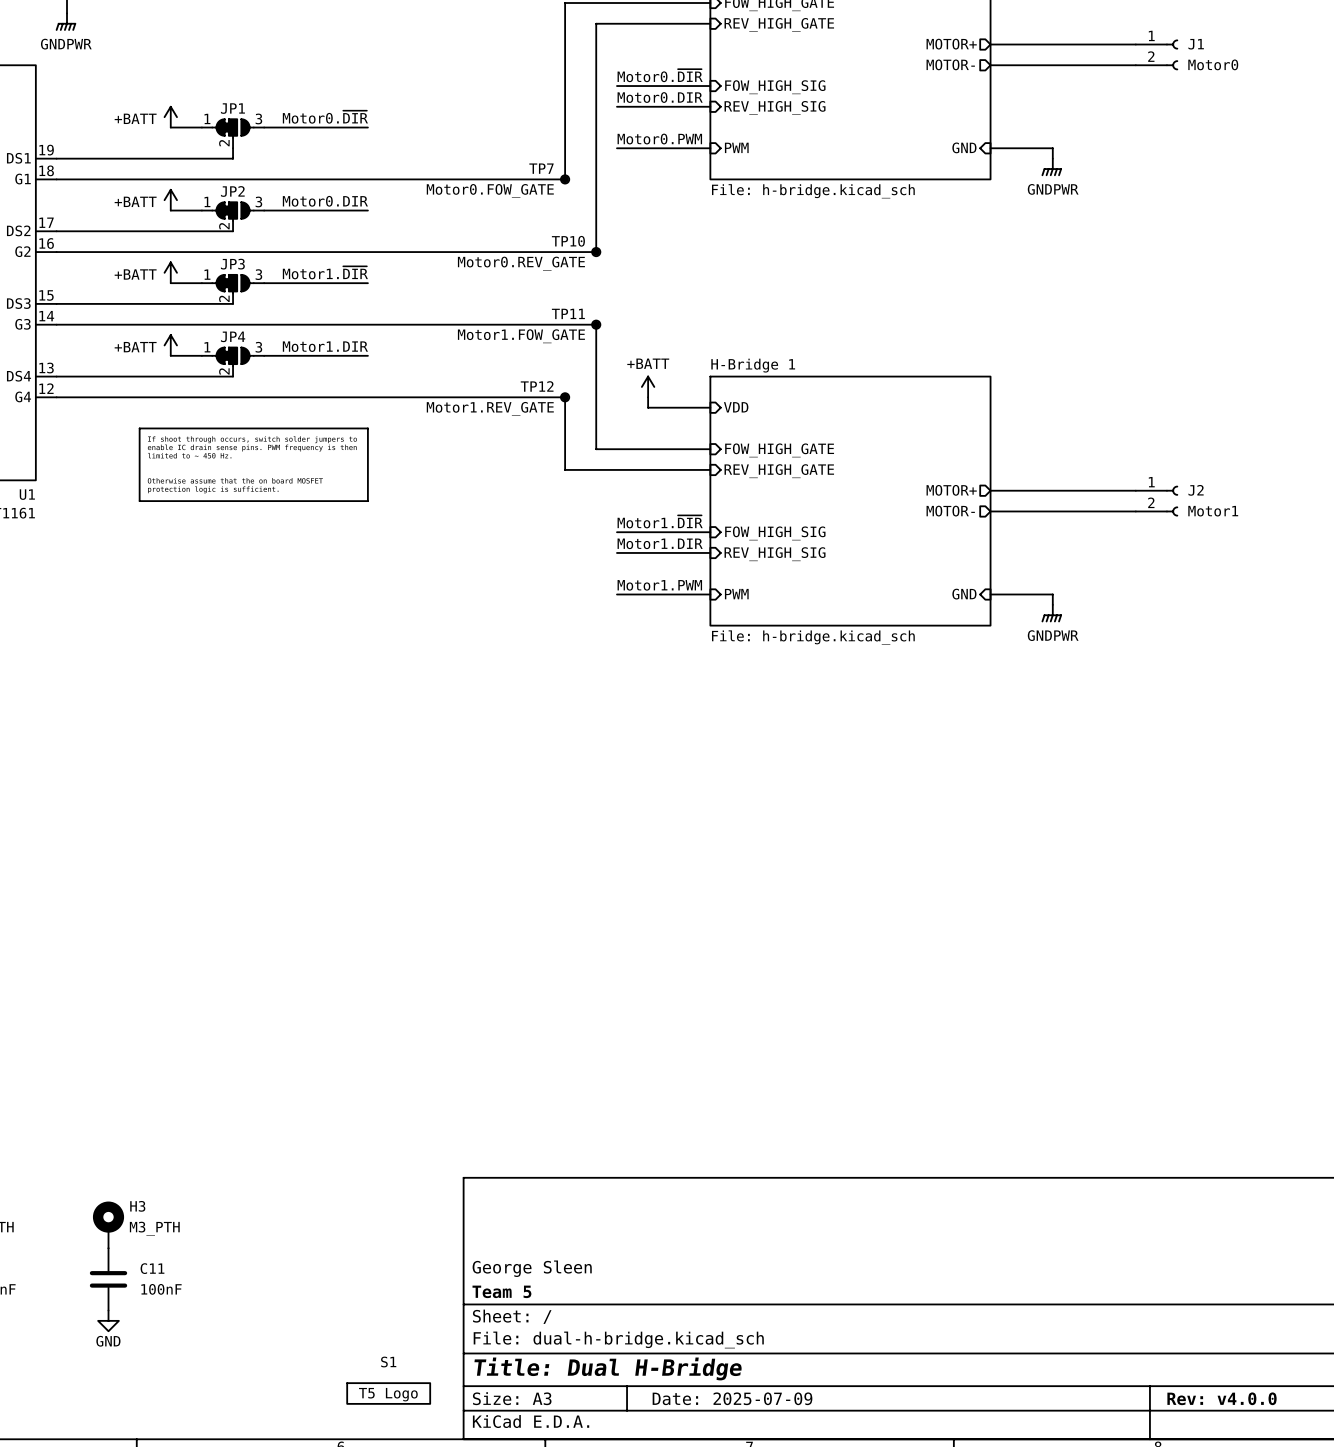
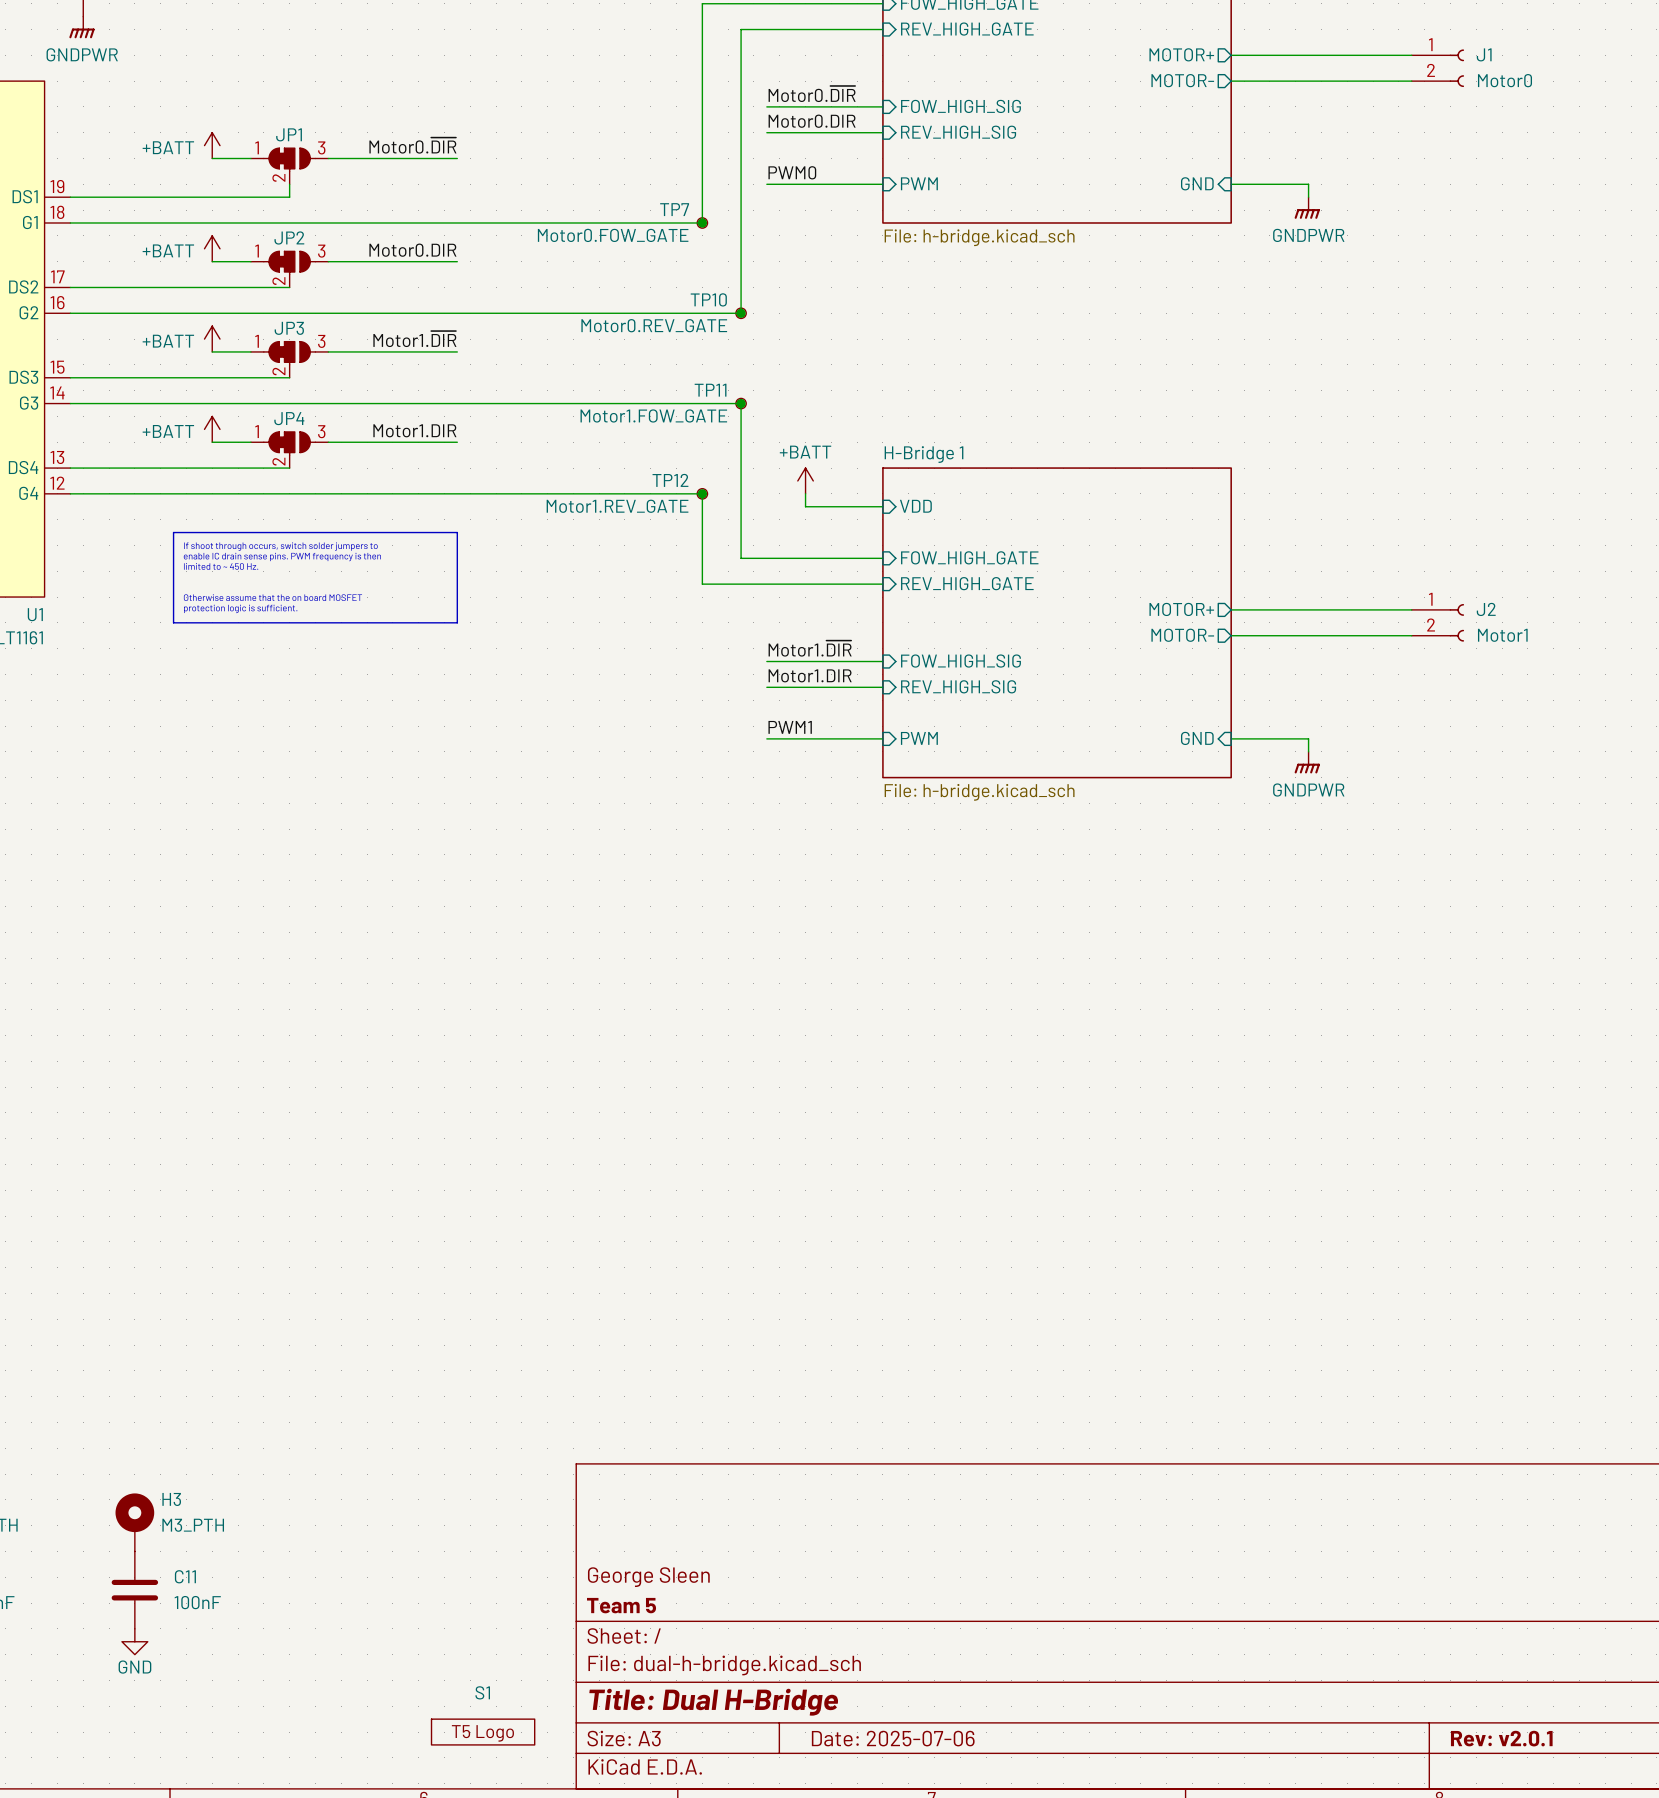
label: Motor0.PWM (659, 139) -> PWM0 (792, 172)
label: Motor1.PWM (659, 585) -> PWM1 (790, 727)
title block: Date: 2025-07-09 (732, 1398) -> Date: 2025-07-06 (893, 1738)
title block: Rev: v4.0.0 (1222, 1398) -> Rev: v2.0.1 (1501, 1738)

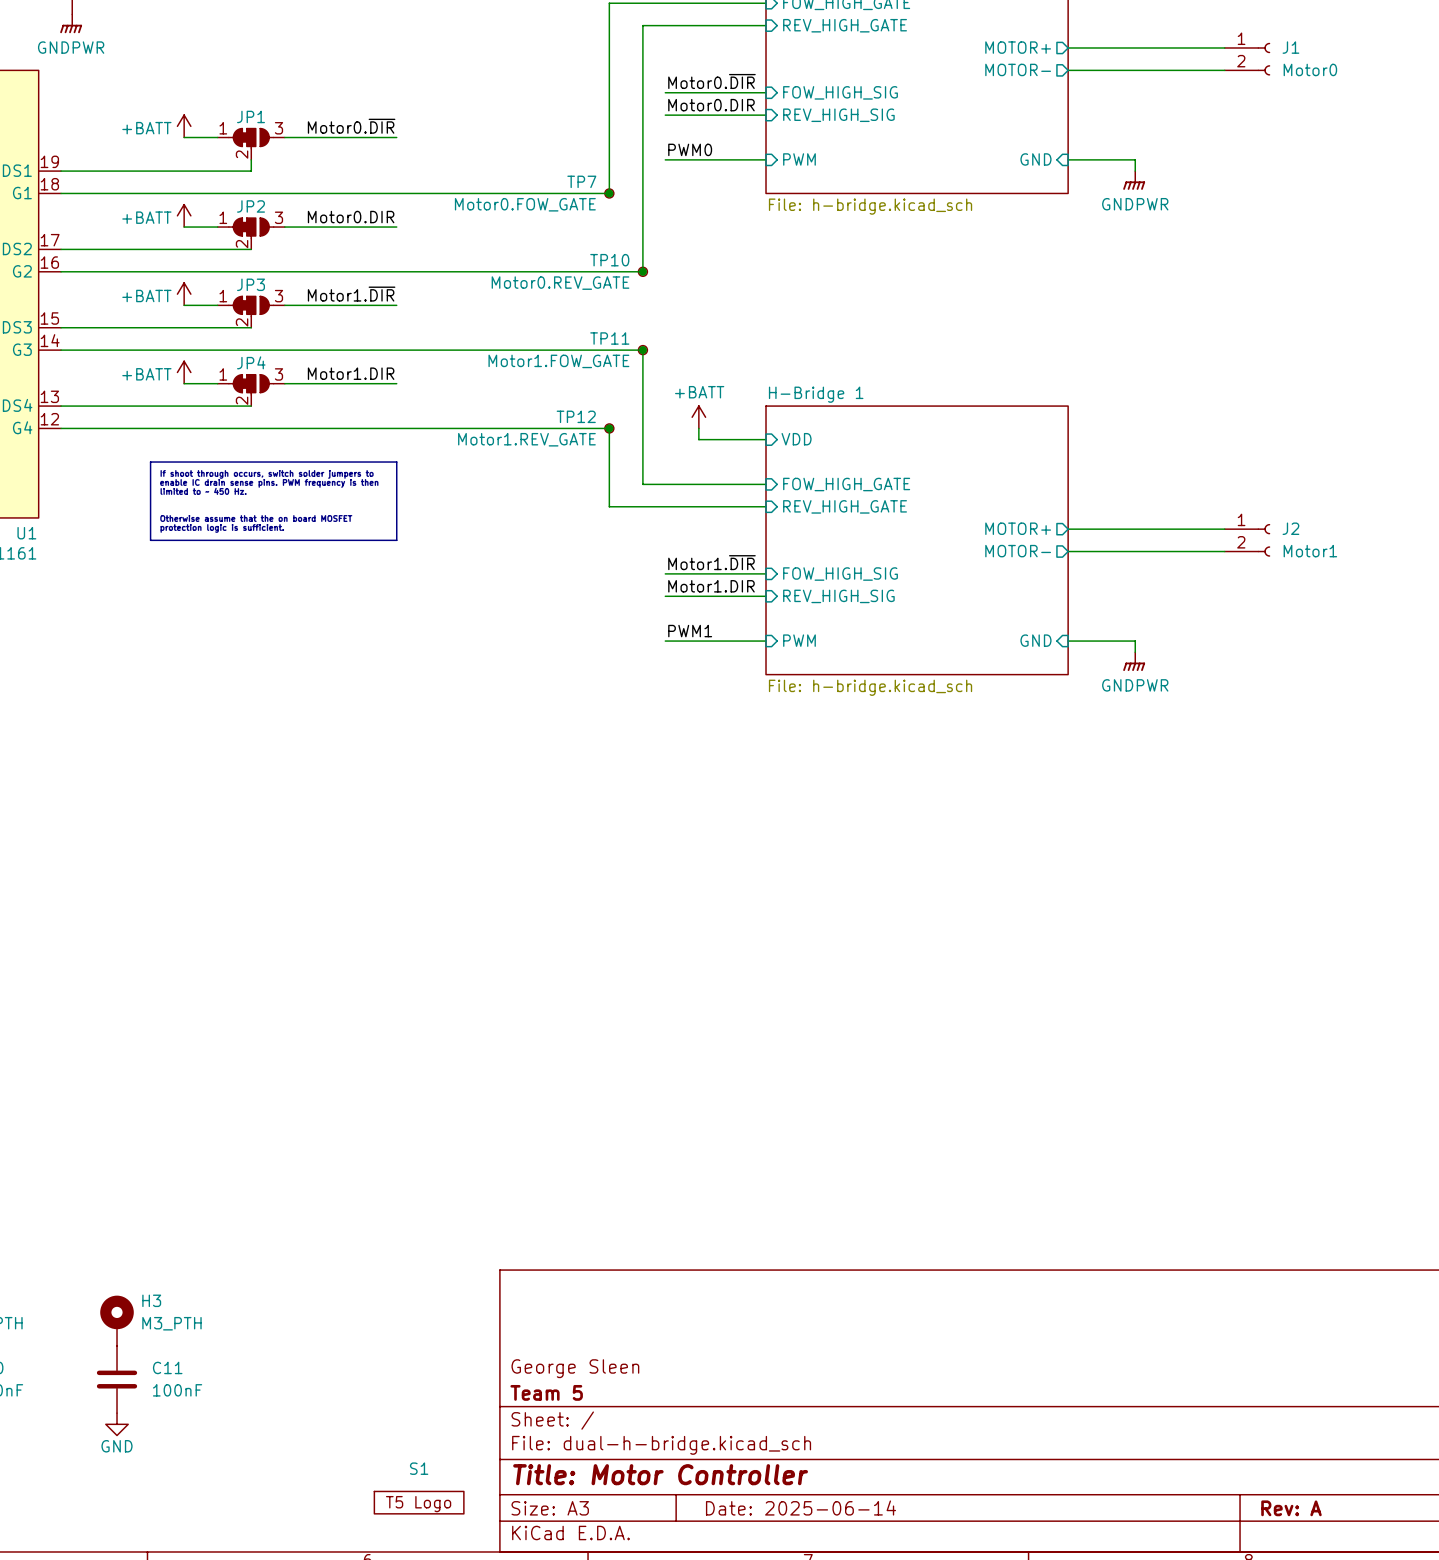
title block: Title: Dual H-Bridge (713, 1702) -> Title: Motor Controller (660, 1474)
title block: Date: 2025-07-06 (893, 1738) -> Date: 2025-06-14 (801, 1508)
title block: Rev: v2.0.1 (1501, 1738) -> Rev: A (1291, 1508)

